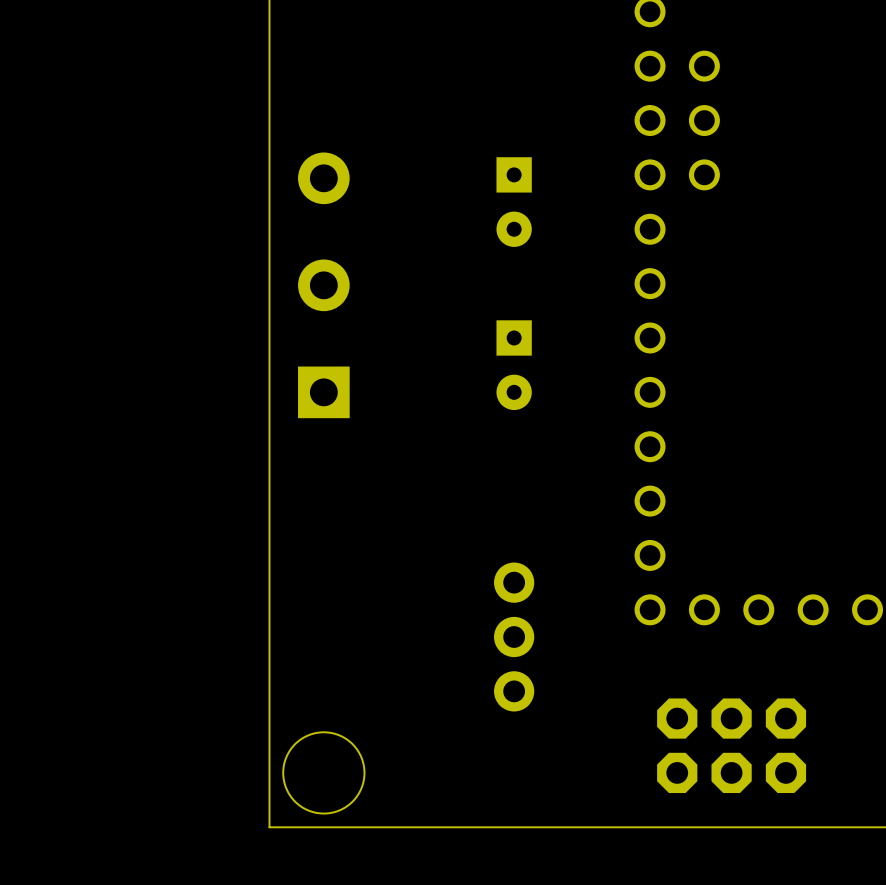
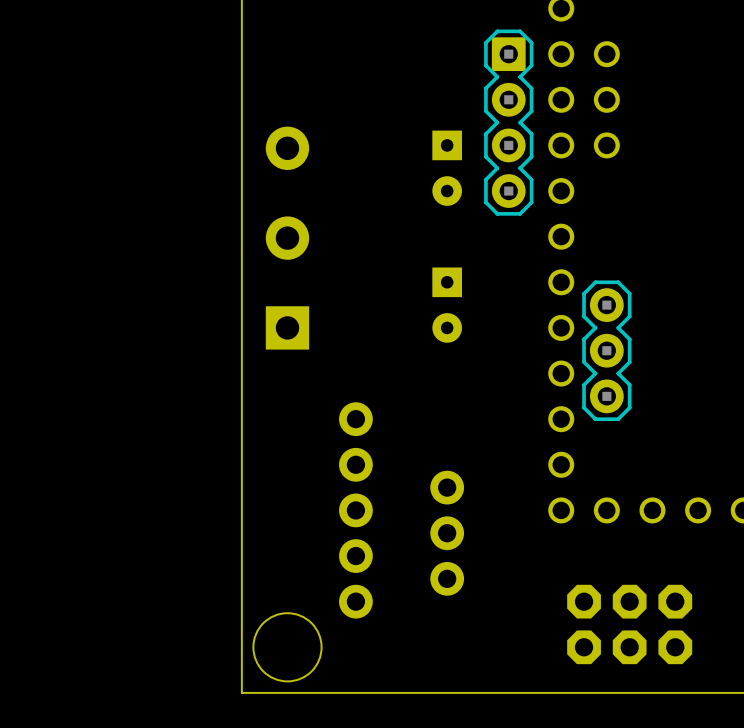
part: none -> (508, 122)
part: none -> (606, 350)
part: none -> (355, 510)

